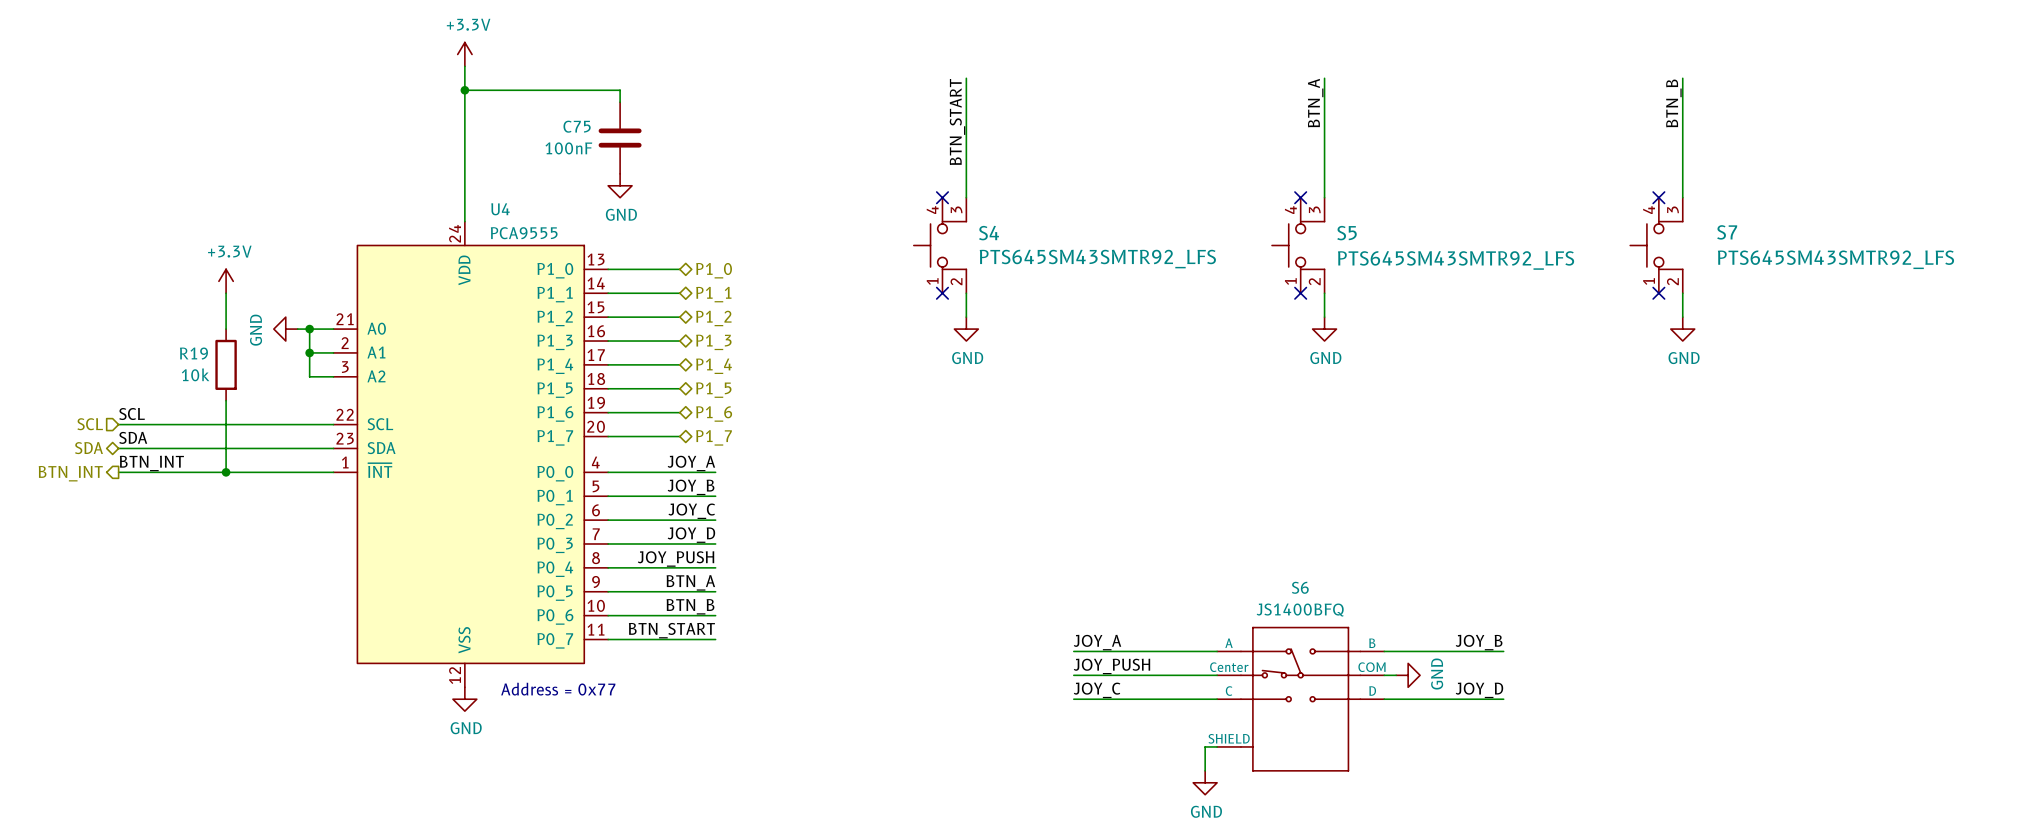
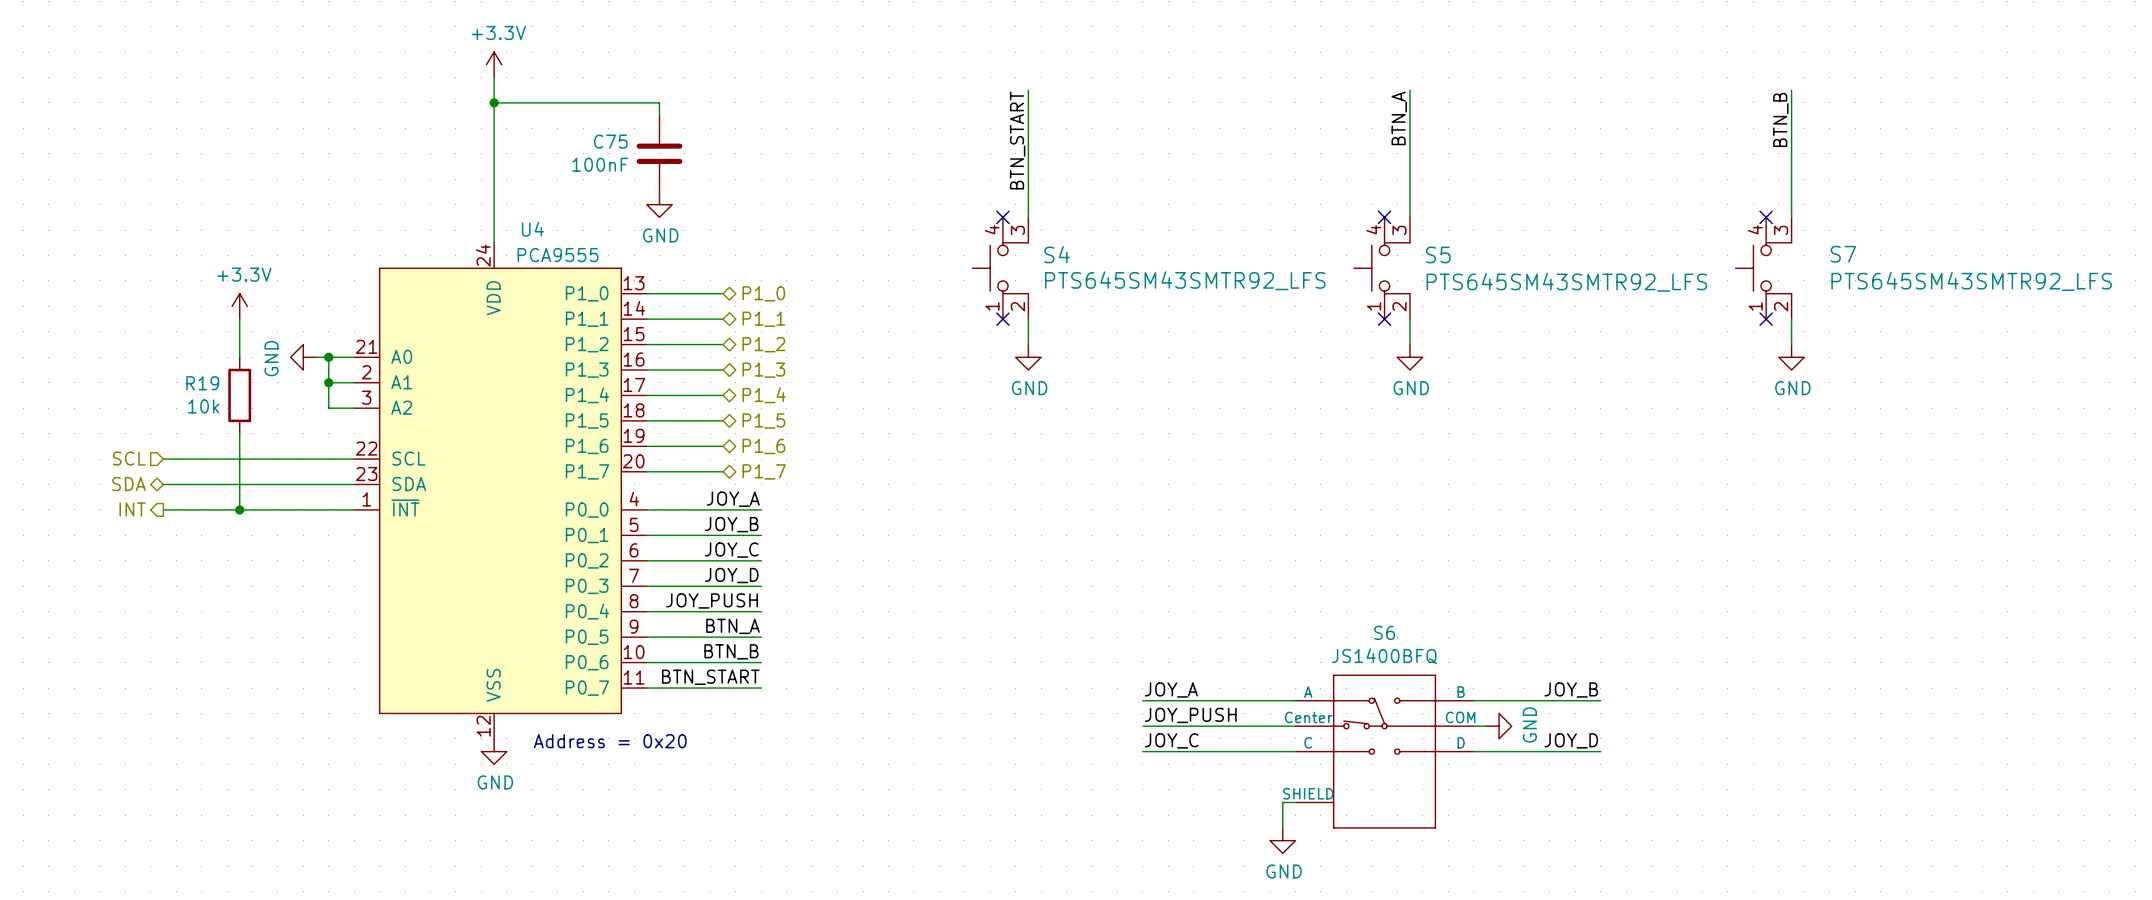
label: SCL (132, 414) -> none
hierarchical label position: SCL (90, 424) -> SCL (129, 458)
wire: (118, 424) (154, 424) -> none
label: SDA (133, 437) -> none
hierarchical label position: SDA (88, 448) -> SDA (128, 484)
wire: (118, 448) (154, 448) -> none
label: BTN_INT (151, 463) -> none
hierarchical label: none -> INT (132, 509)
wire: (118, 472) (154, 472) -> none
hierarchical label: BTN_INT (70, 473) -> none
text: Address = 0x77 (558, 689) -> Address = 0x20 (610, 741)

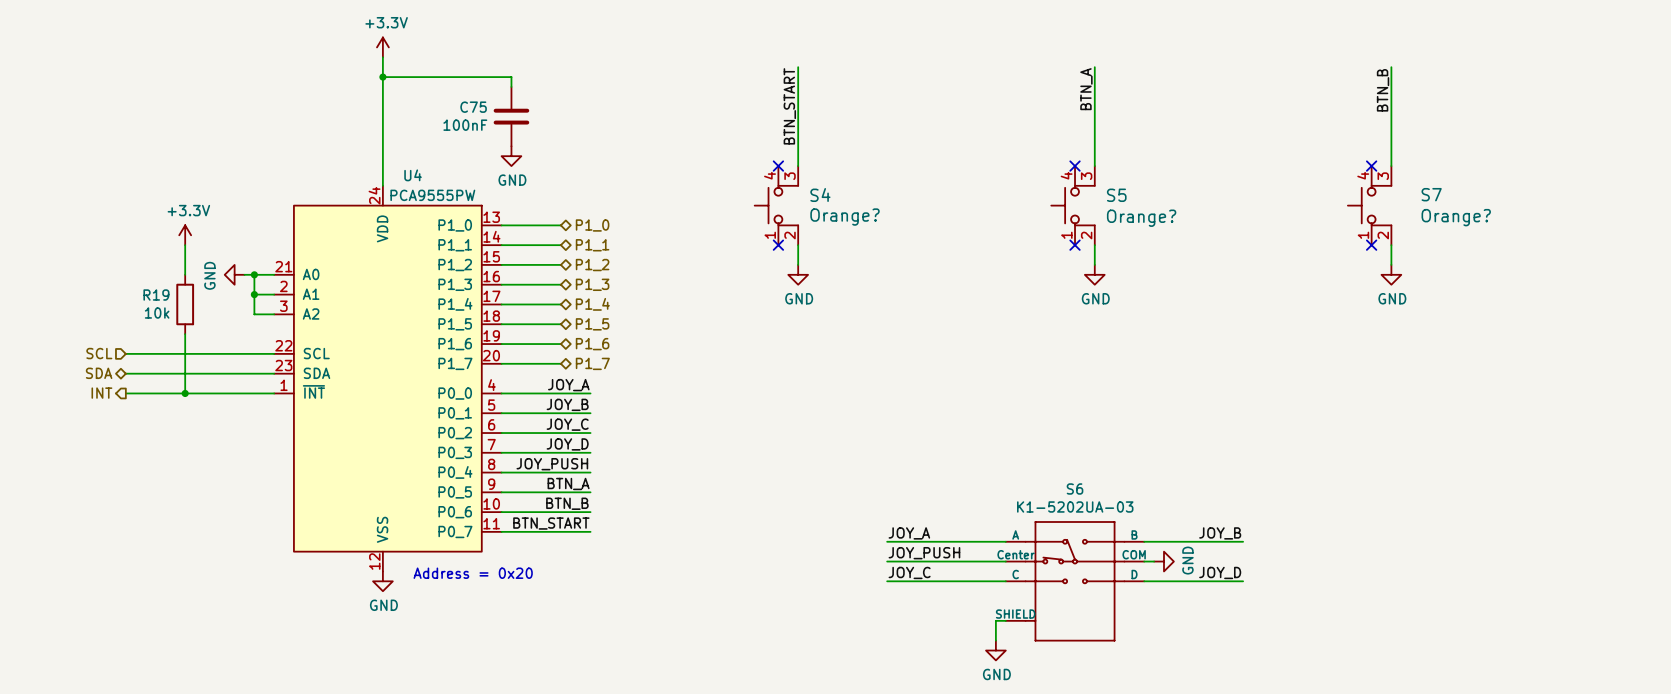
U4 value: PCA9555 (558, 255) -> PCA9555PW (432, 195)
S4 value: PTS645SM43SMTR92_LFS (1185, 280) -> Orange? (845, 217)
S7 value: PTS645SM43SMTR92_LFS (1971, 281) -> Orange? (1456, 217)
S5 value: PTS645SM43SMTR92_LFS (1566, 282) -> Orange? (1141, 218)
S6 value: JS1400BFQ (1384, 656) -> K1-5202UA-03 (1075, 506)

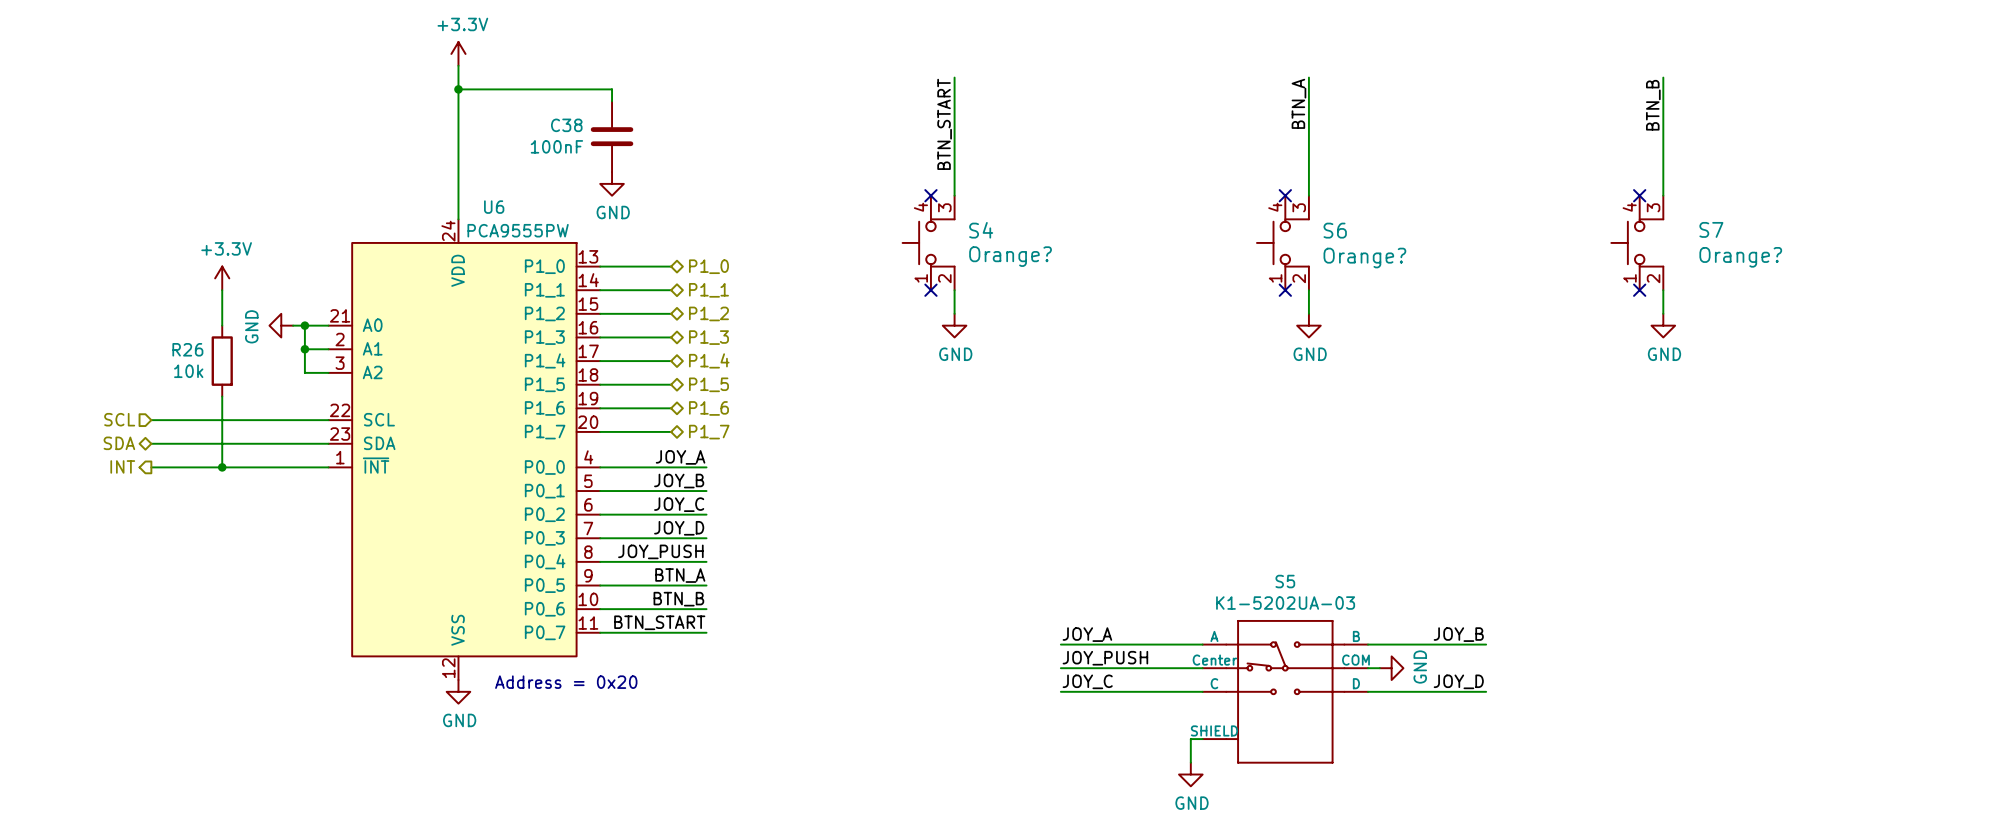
C75 name: C75 (473, 107) -> C38 (566, 125)
U4 name: U4 (413, 175) -> U6 (494, 207)
S5 name: S5 (1116, 195) -> S6 (1335, 230)
R19 name: R19 (156, 295) -> R26 (187, 349)
S6 name: S6 (1075, 489) -> S5 (1285, 581)

